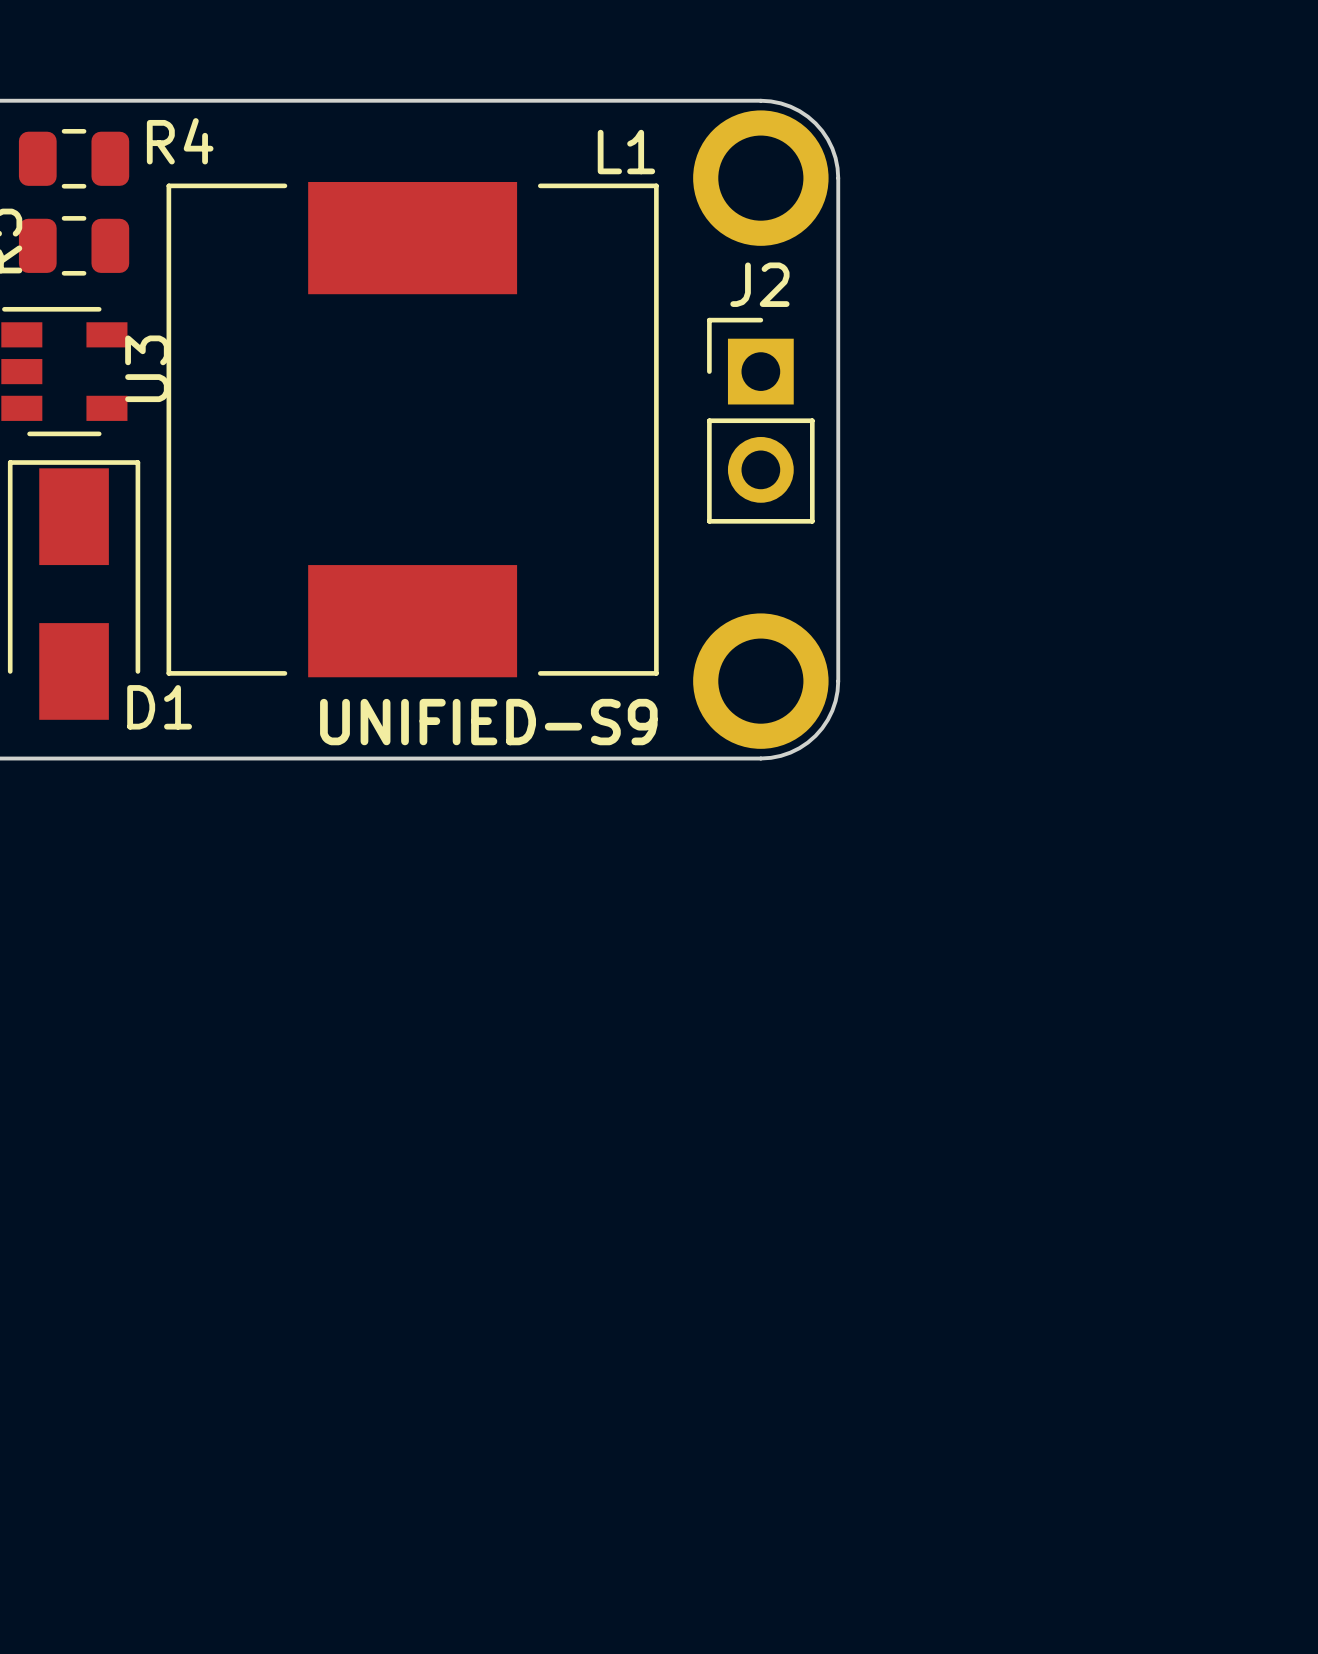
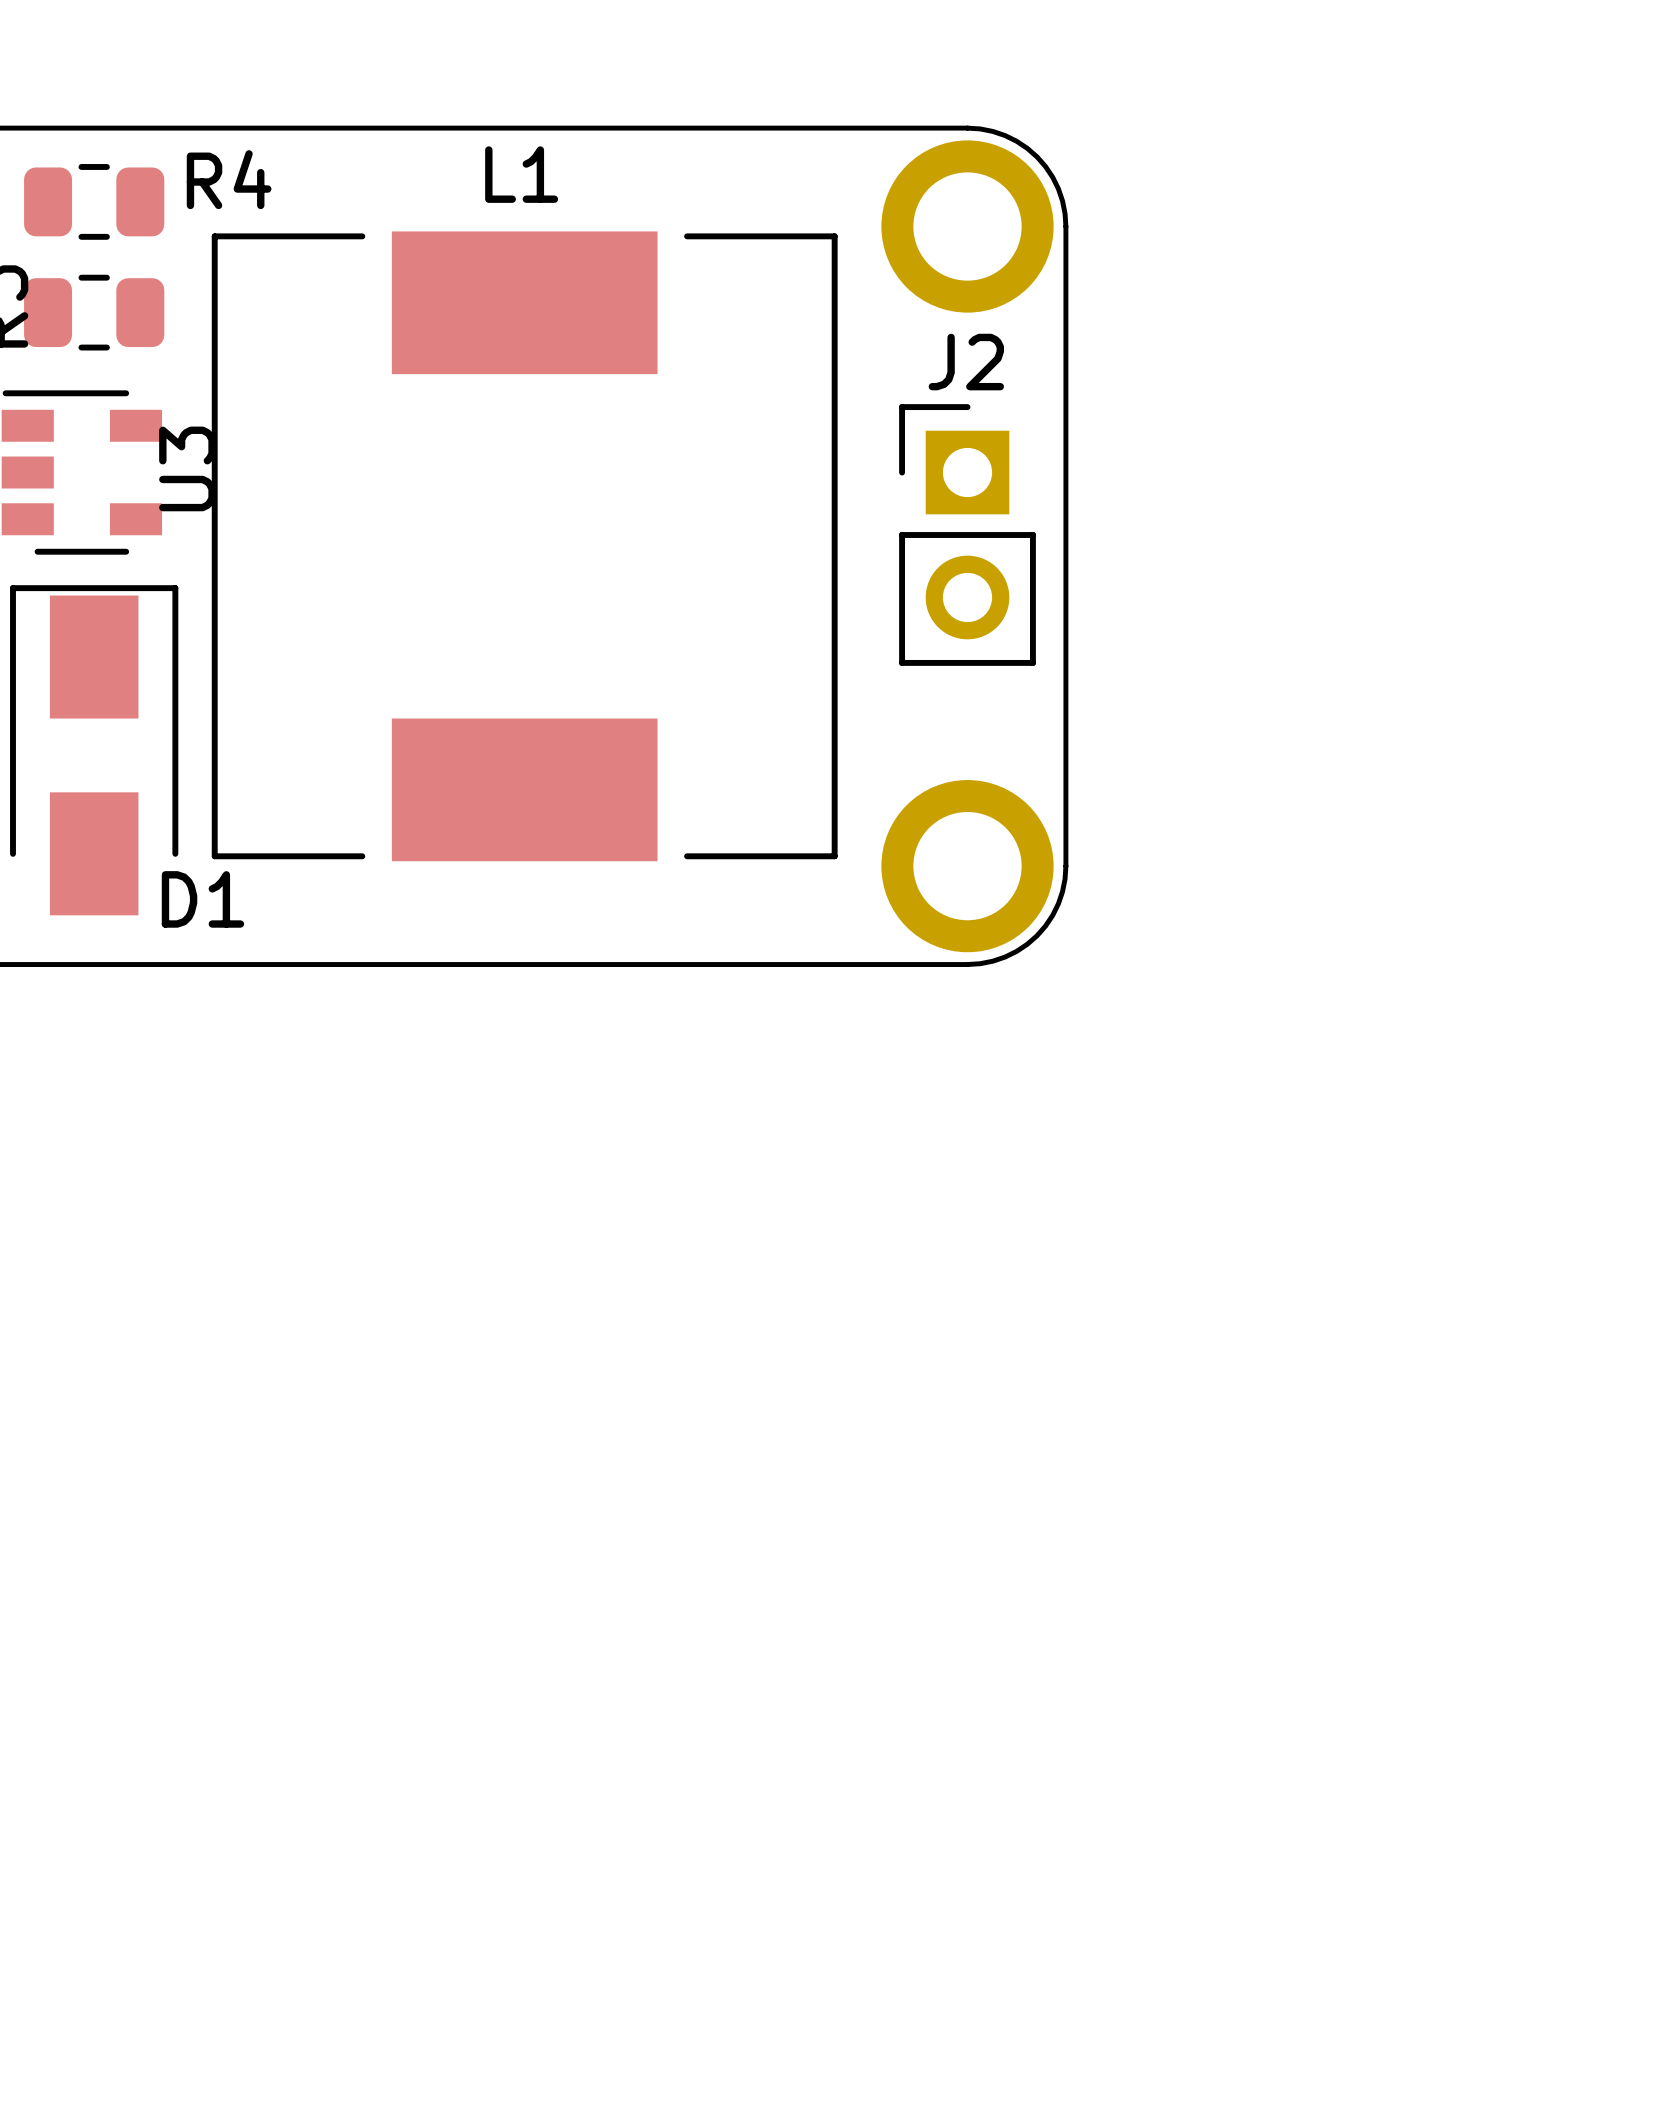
L1 name position: L1 (626, 152) -> L1 (521, 174)
text: UNIFIED-S9 (488, 722) -> none

